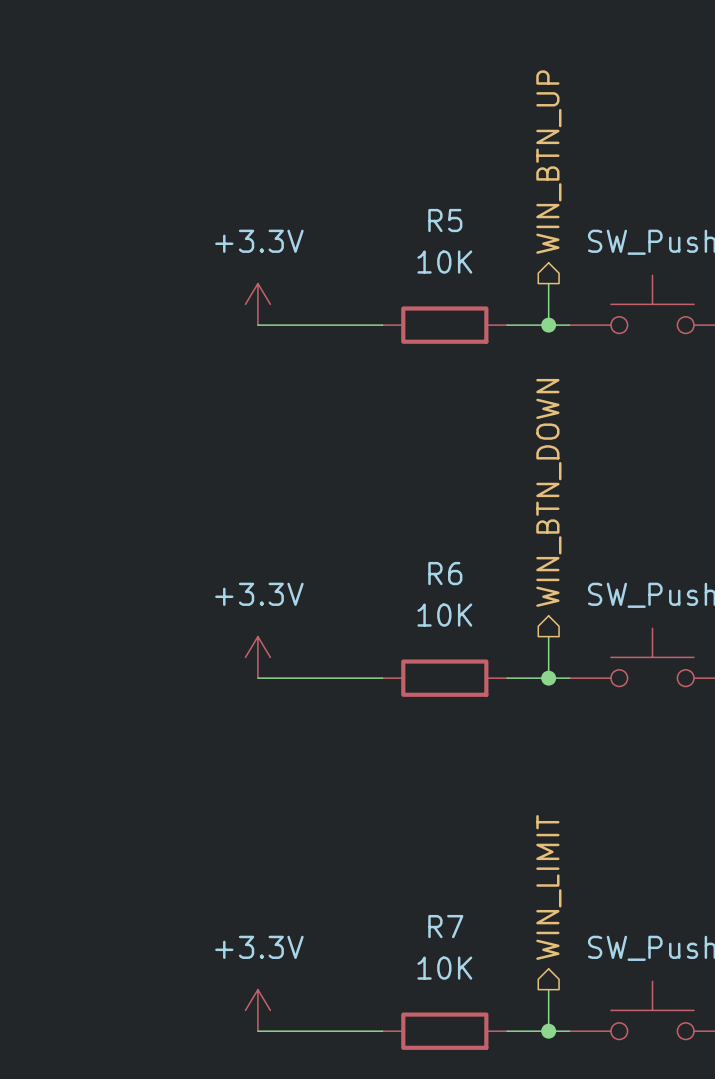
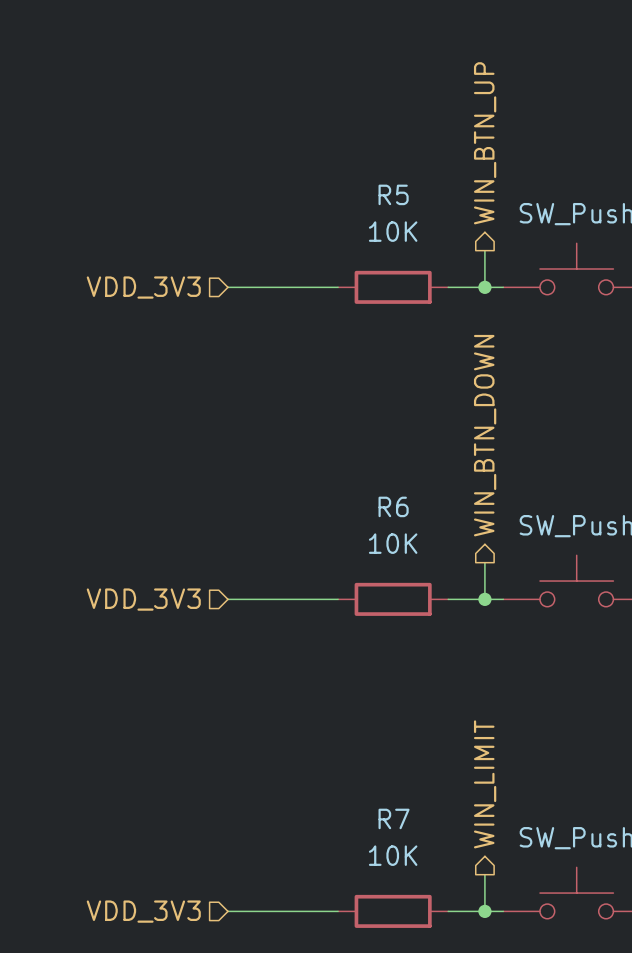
power symbol: +3.3V (257, 304) -> none
hierarchical label: none -> VDD_3V3 (143, 287)
power symbol: +3.3V (257, 657) -> none
hierarchical label: none -> VDD_3V3 (143, 599)
power symbol: +3.3V (257, 1010) -> none
hierarchical label: none -> VDD_3V3 (143, 911)

